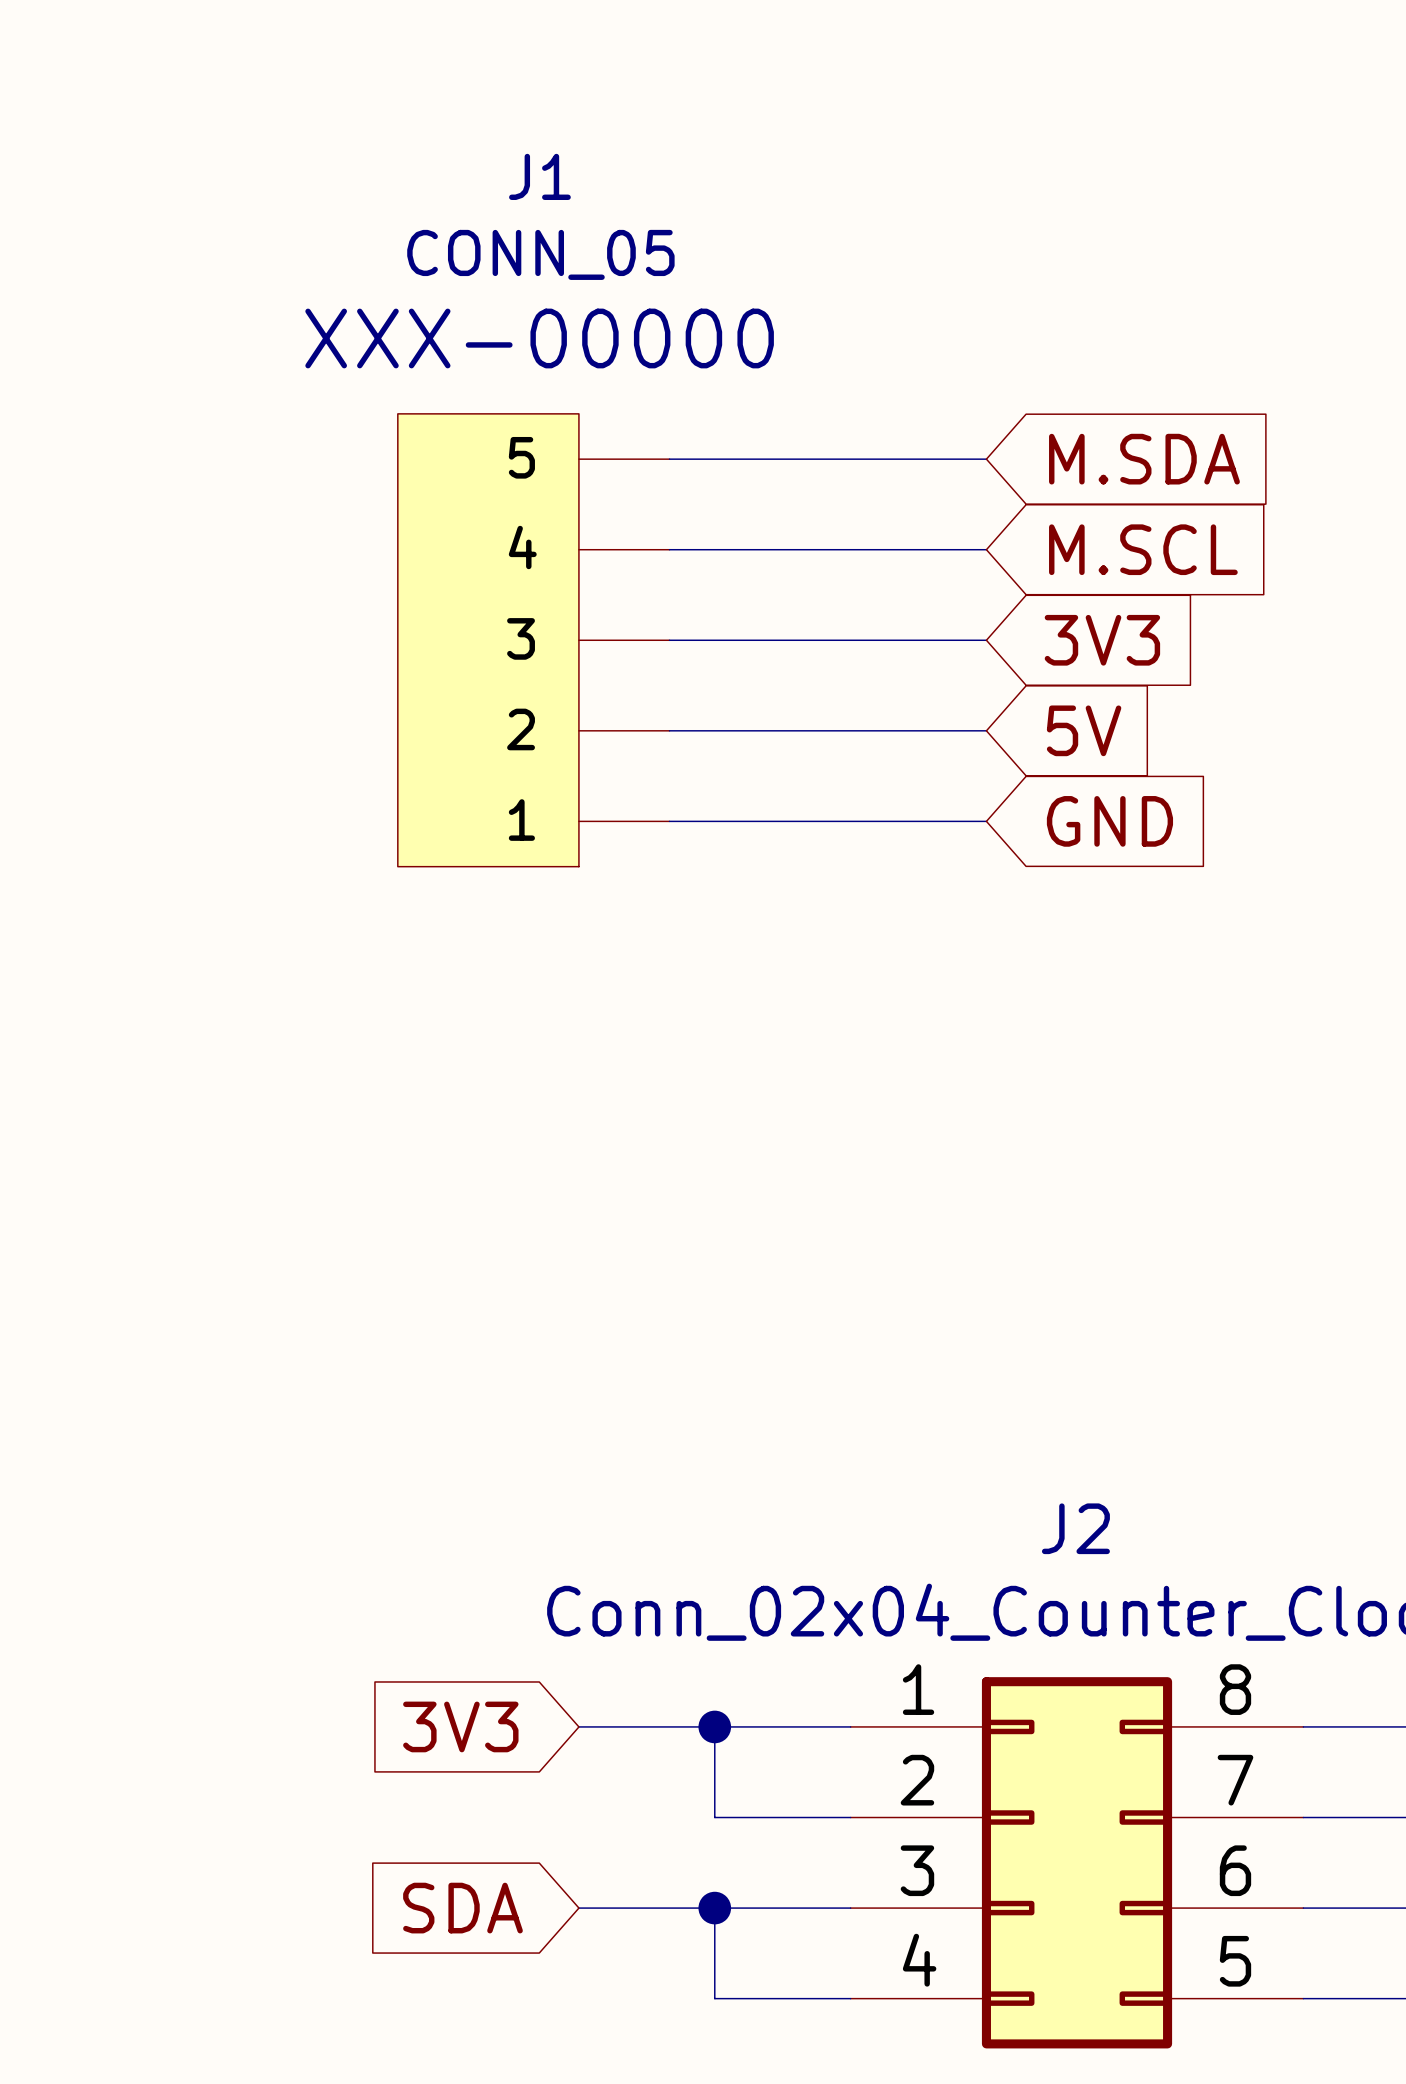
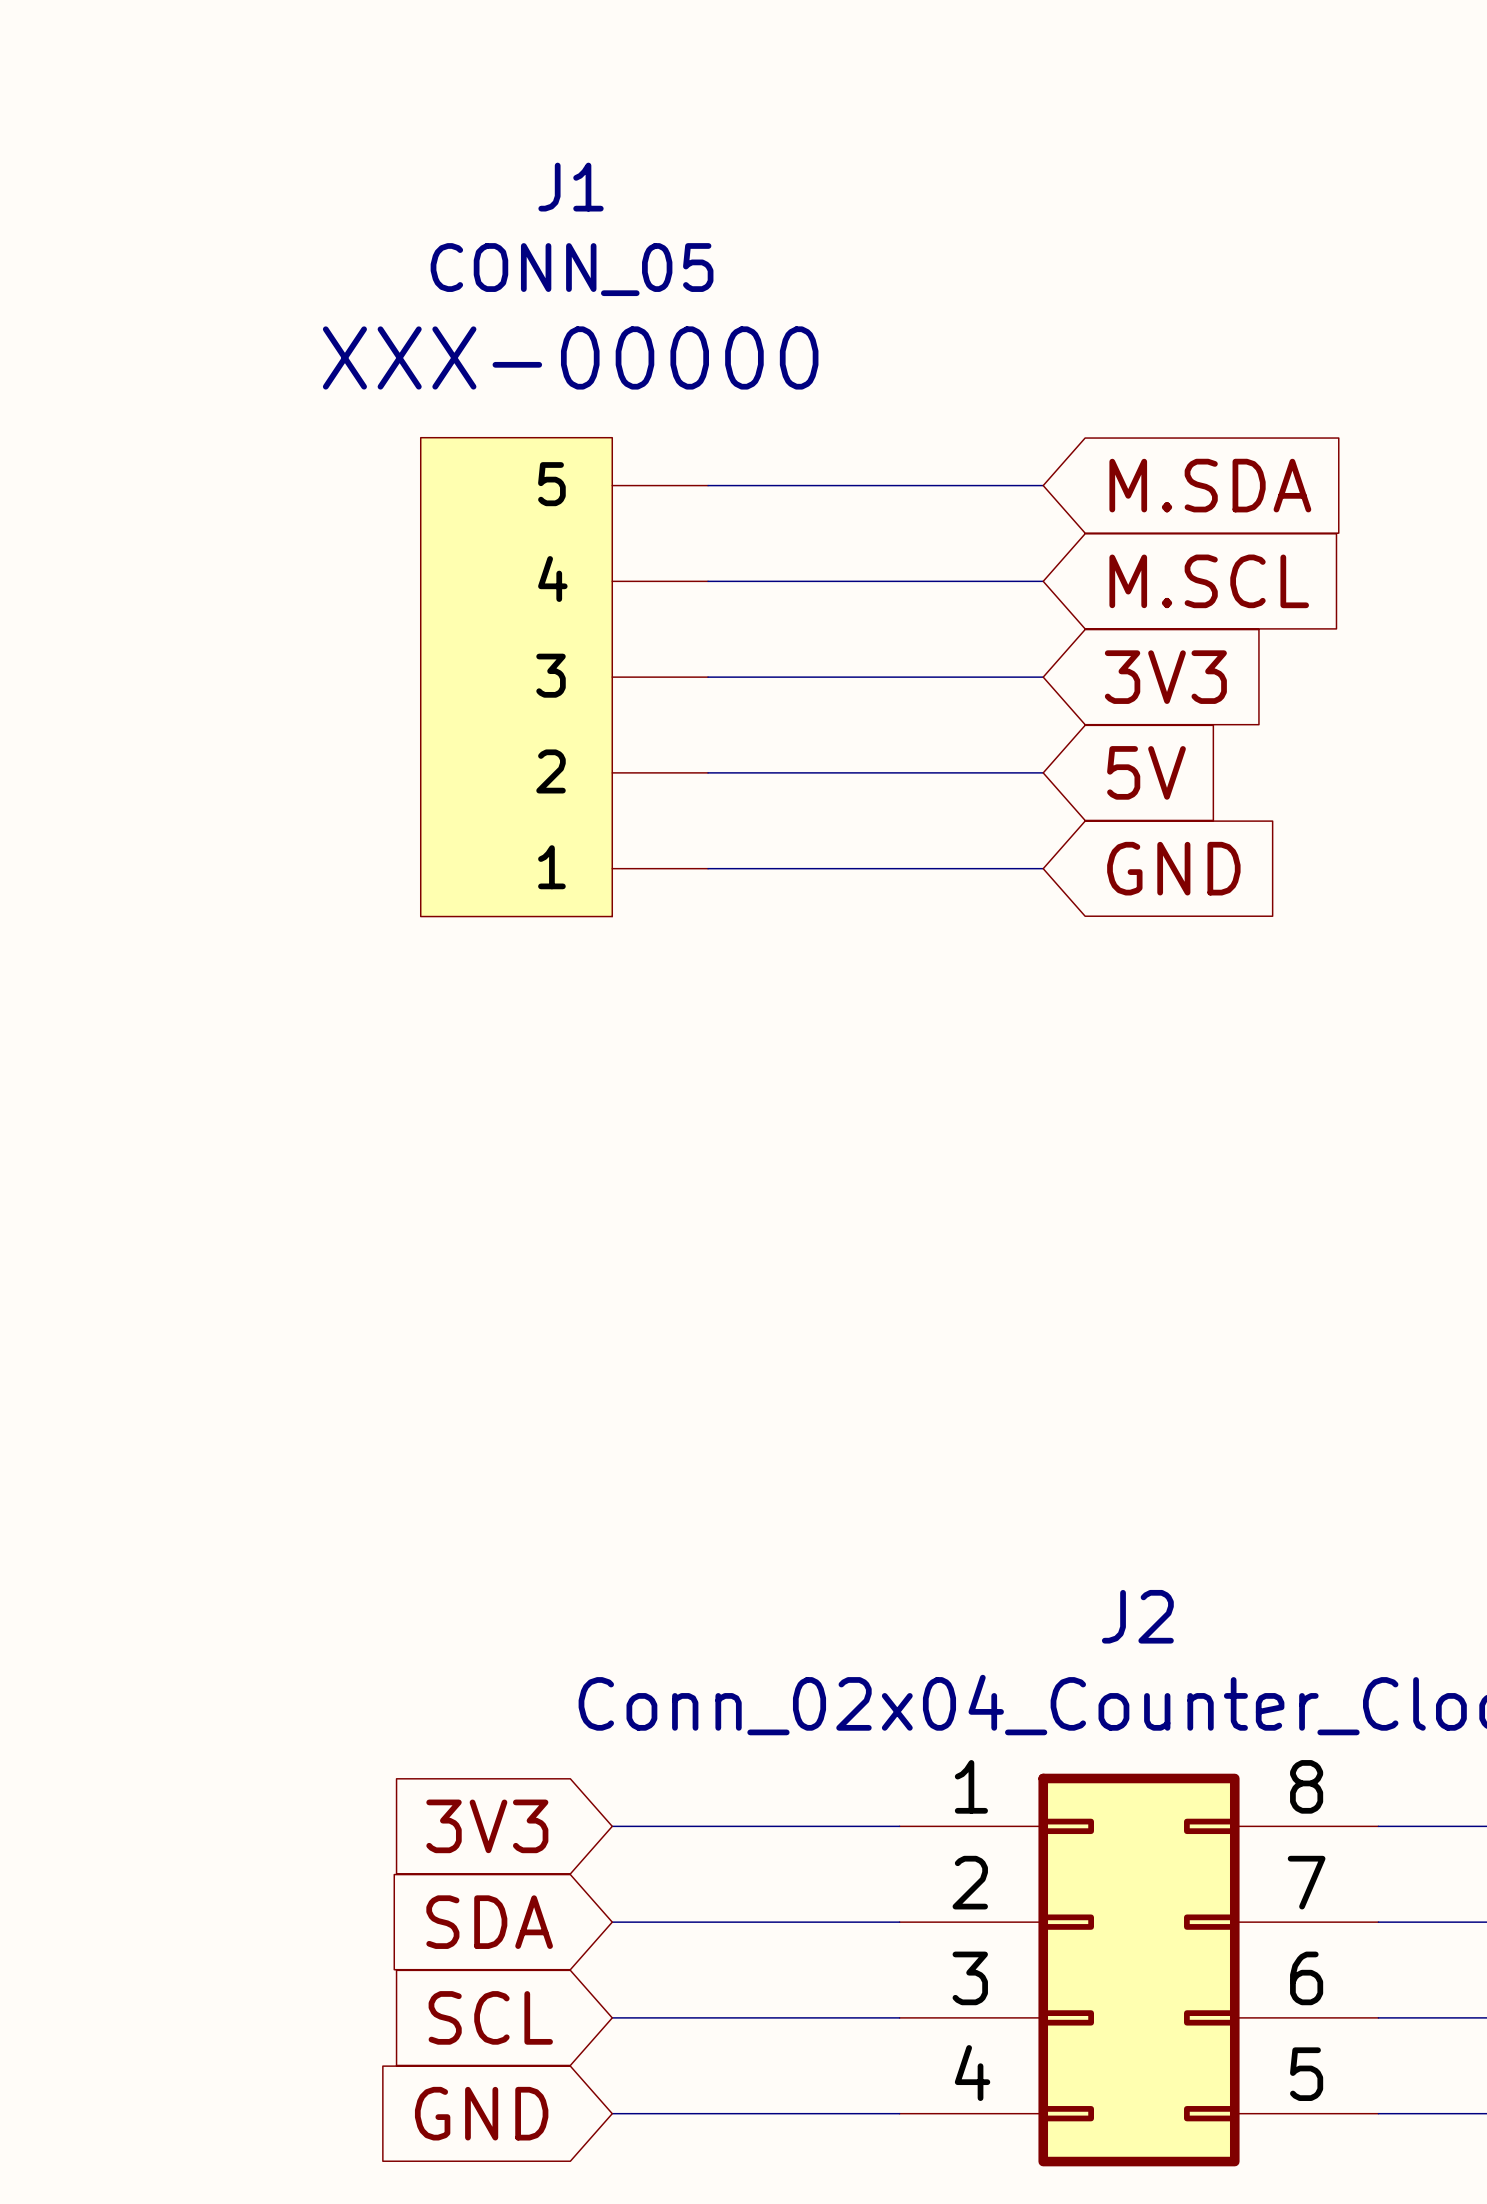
wire: (714, 1726) (714, 1817) -> (612, 1922) (755, 1922)
junction: (714, 1726) -> none
global label: none -> SDA (489, 1922)
global label: SDA (462, 1908) -> SCL (490, 2017)
wire: (714, 1908) (714, 1998) -> (612, 2113) (755, 2113)
junction: (714, 1908) -> none
global label: none -> GND (481, 2113)

